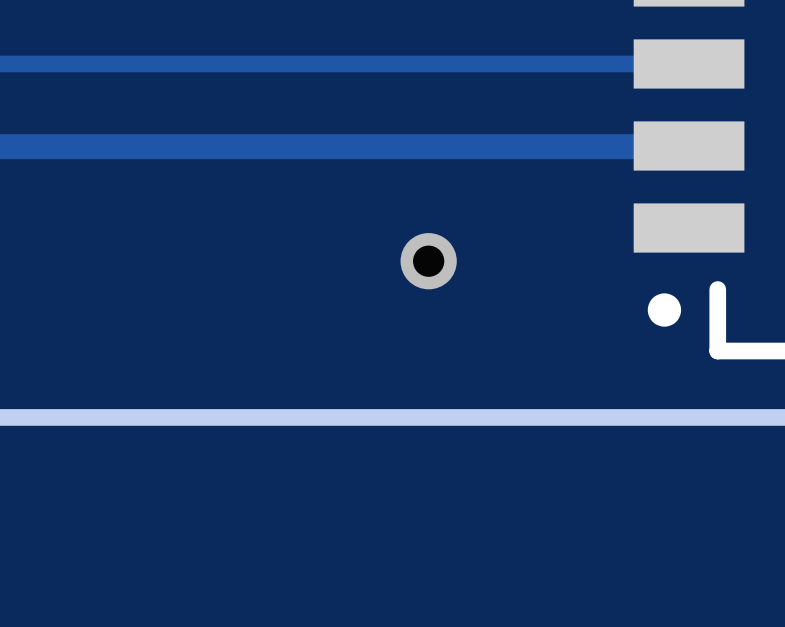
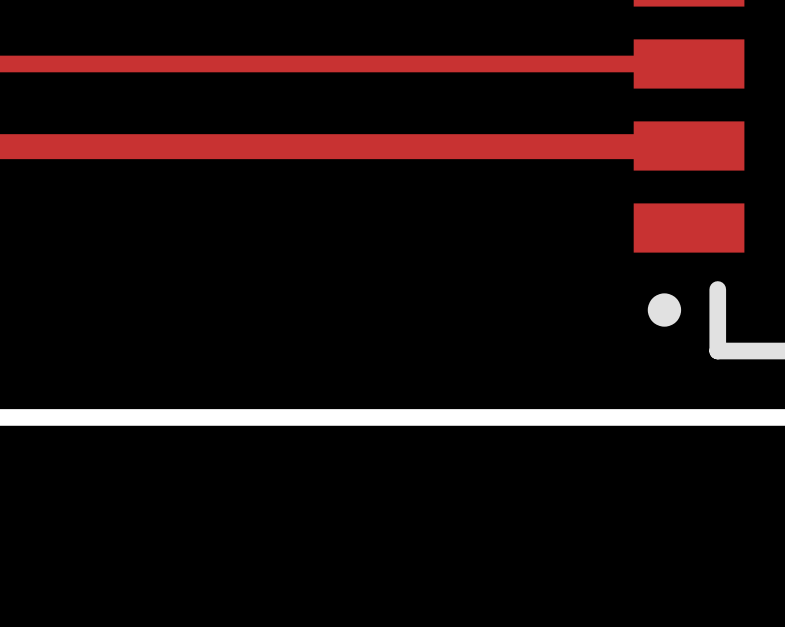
via: (428, 261) -> none

